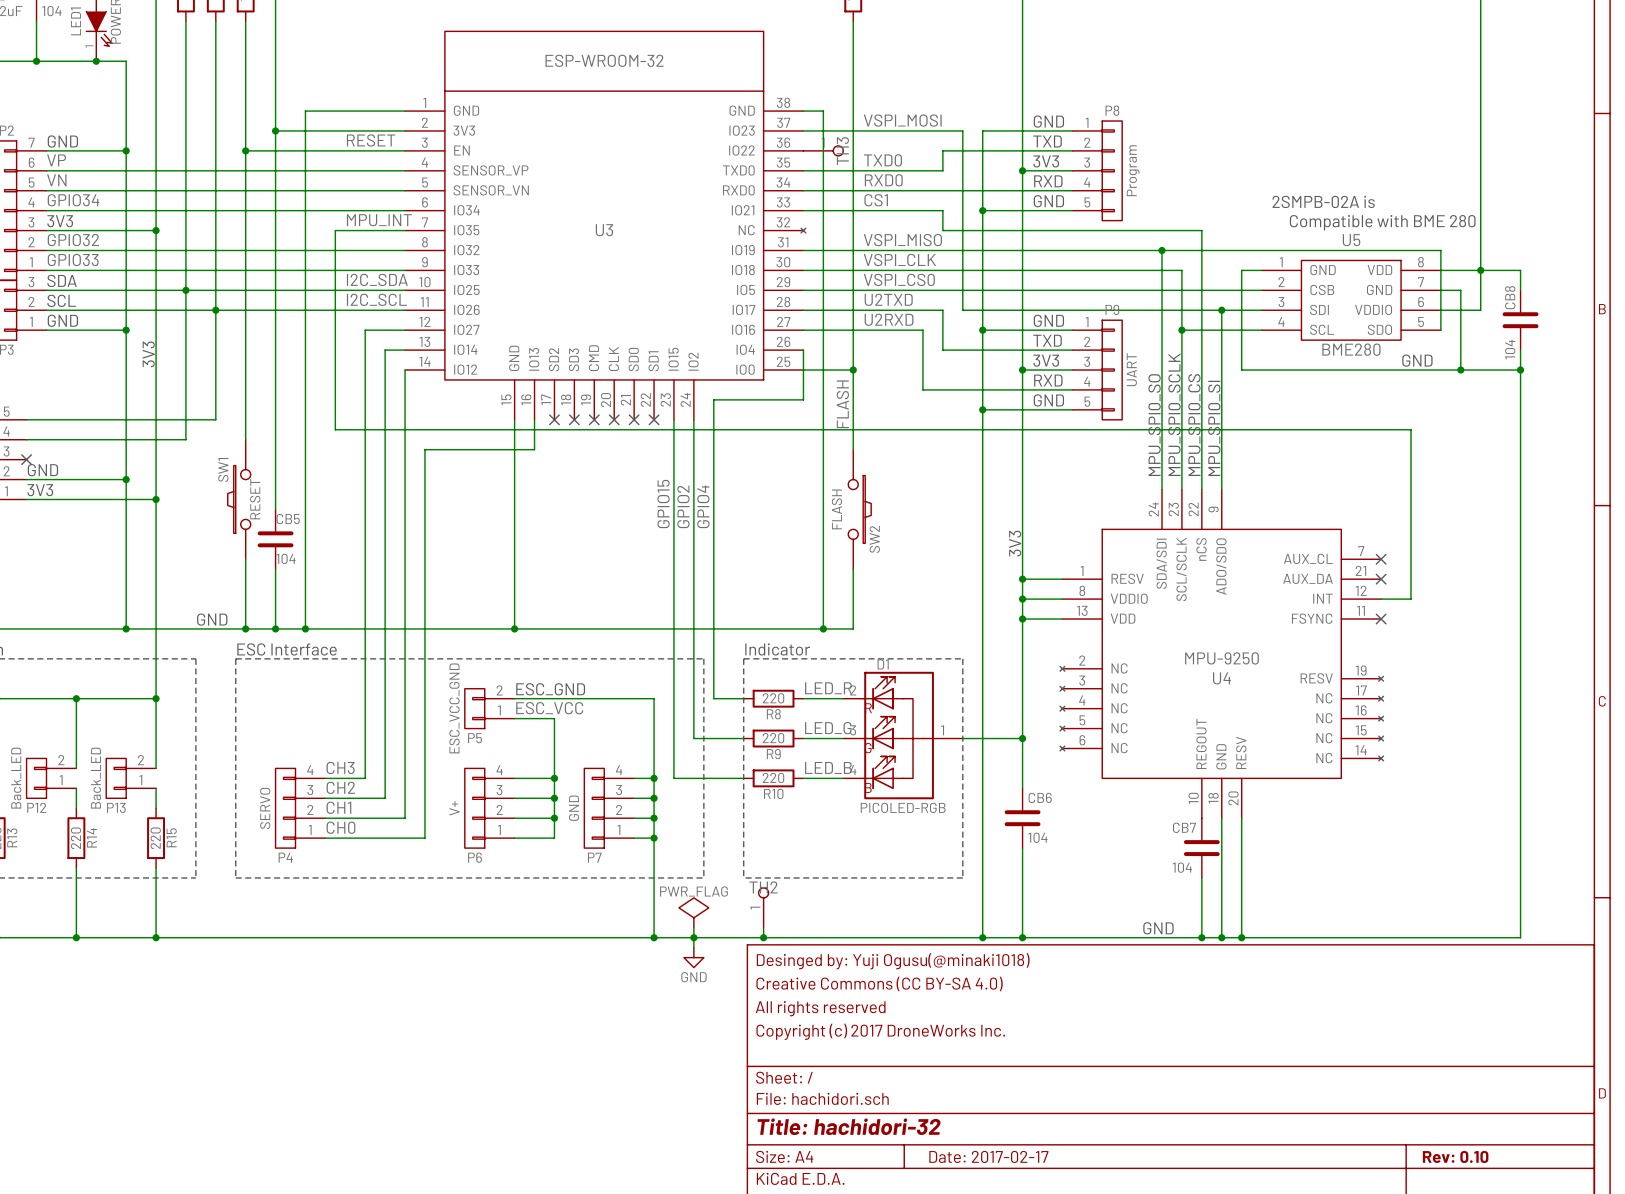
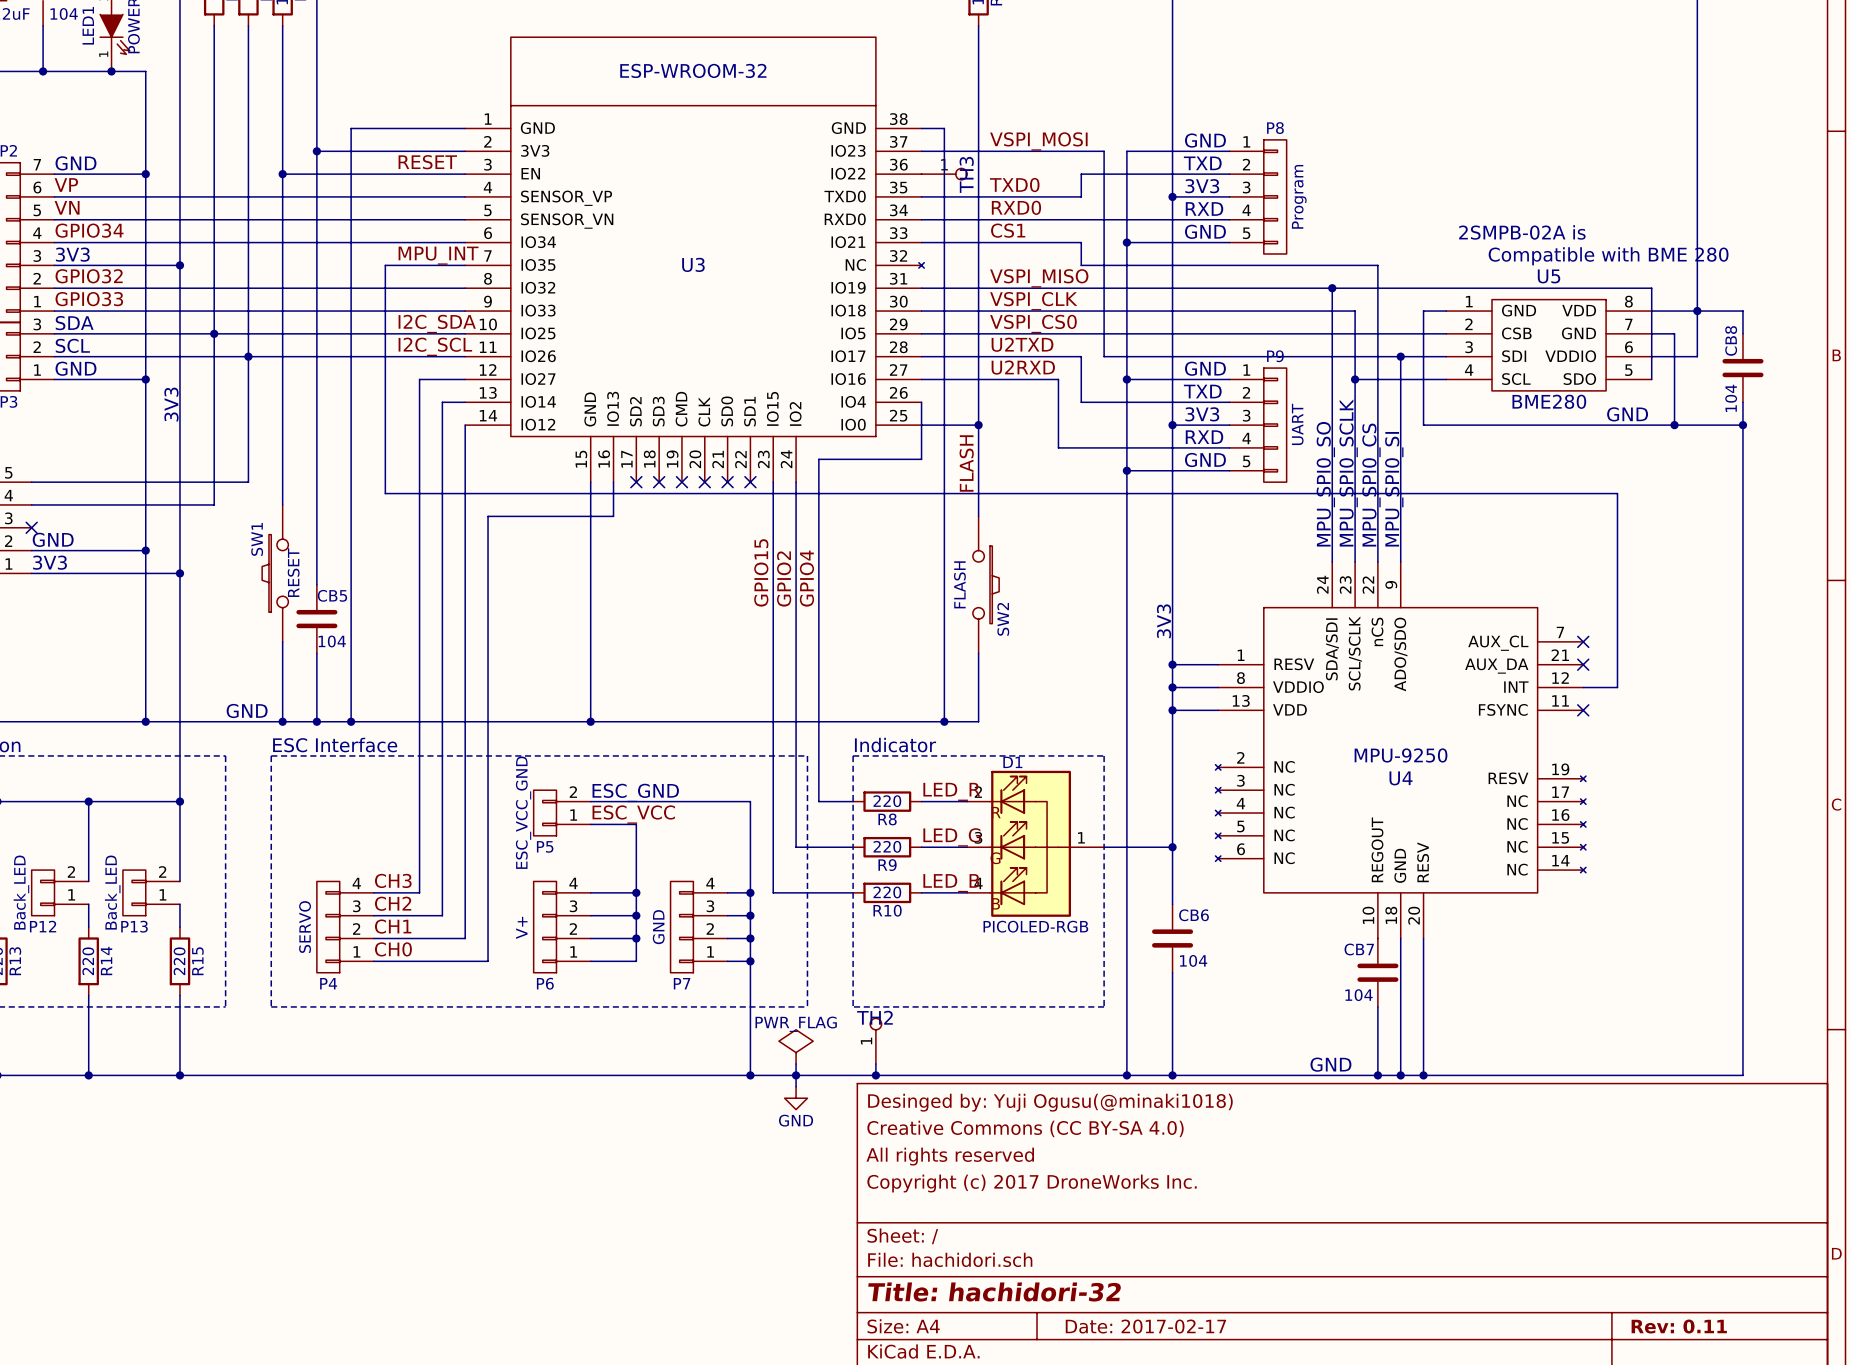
title block: Rev: 0.10 (1455, 1156) -> Rev: 0.11 (1679, 1326)

